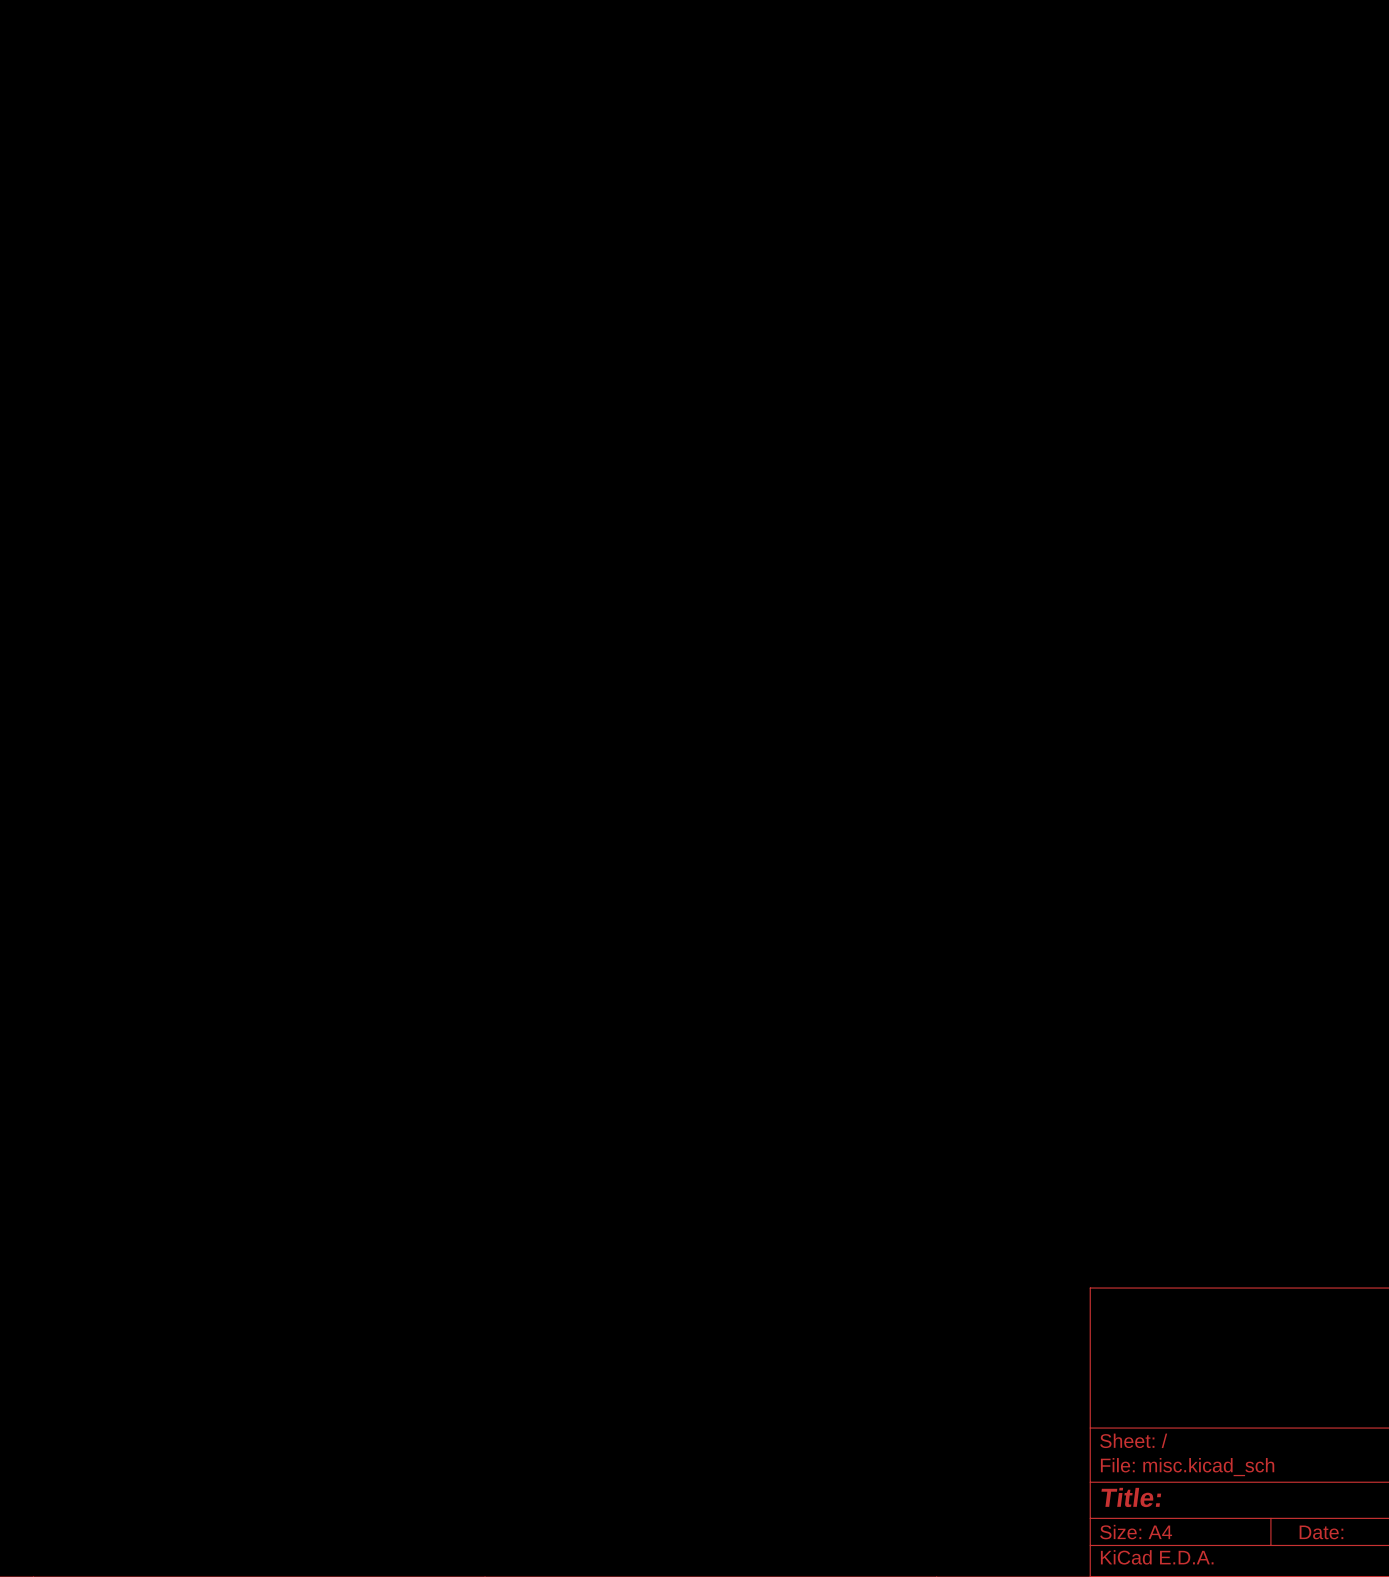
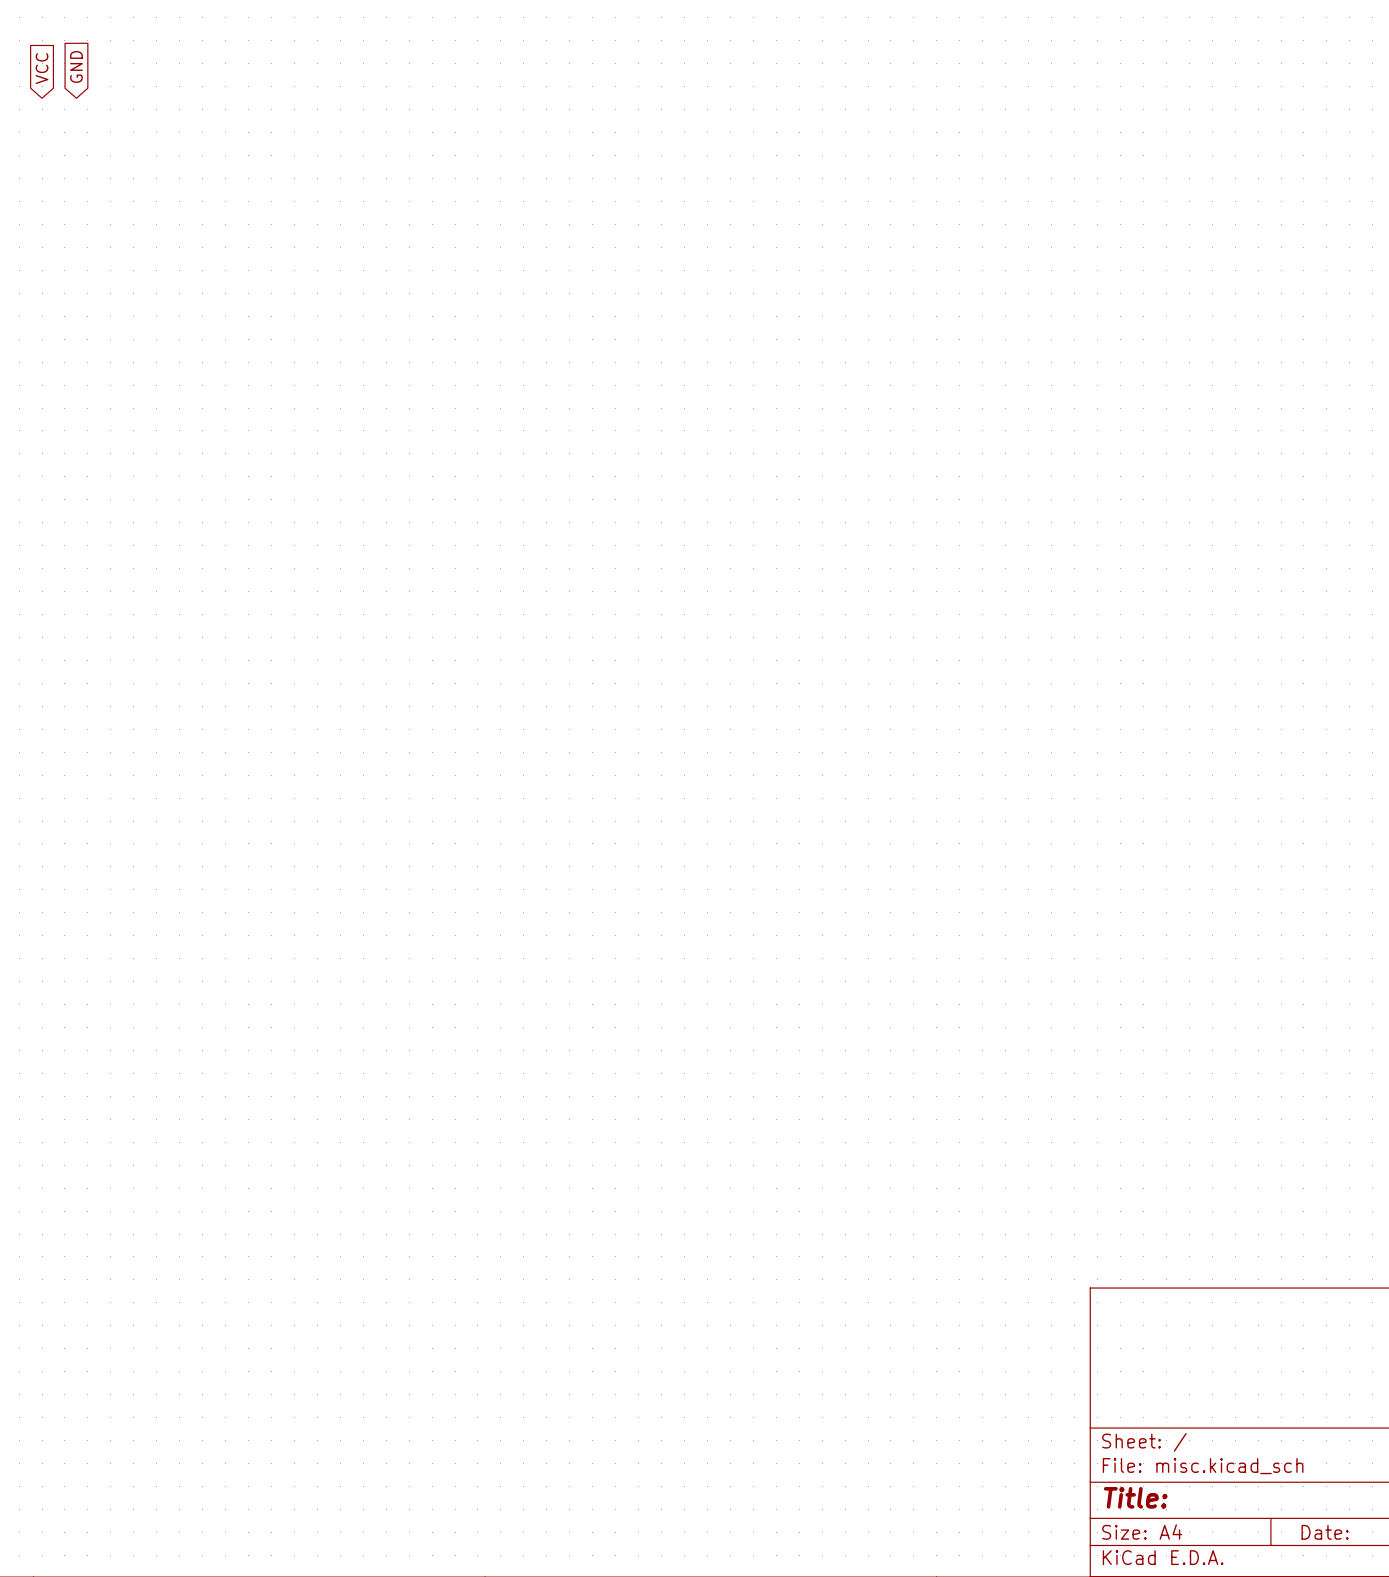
global label: none -> GND (76, 66)
global label: none -> VCC (42, 68)

